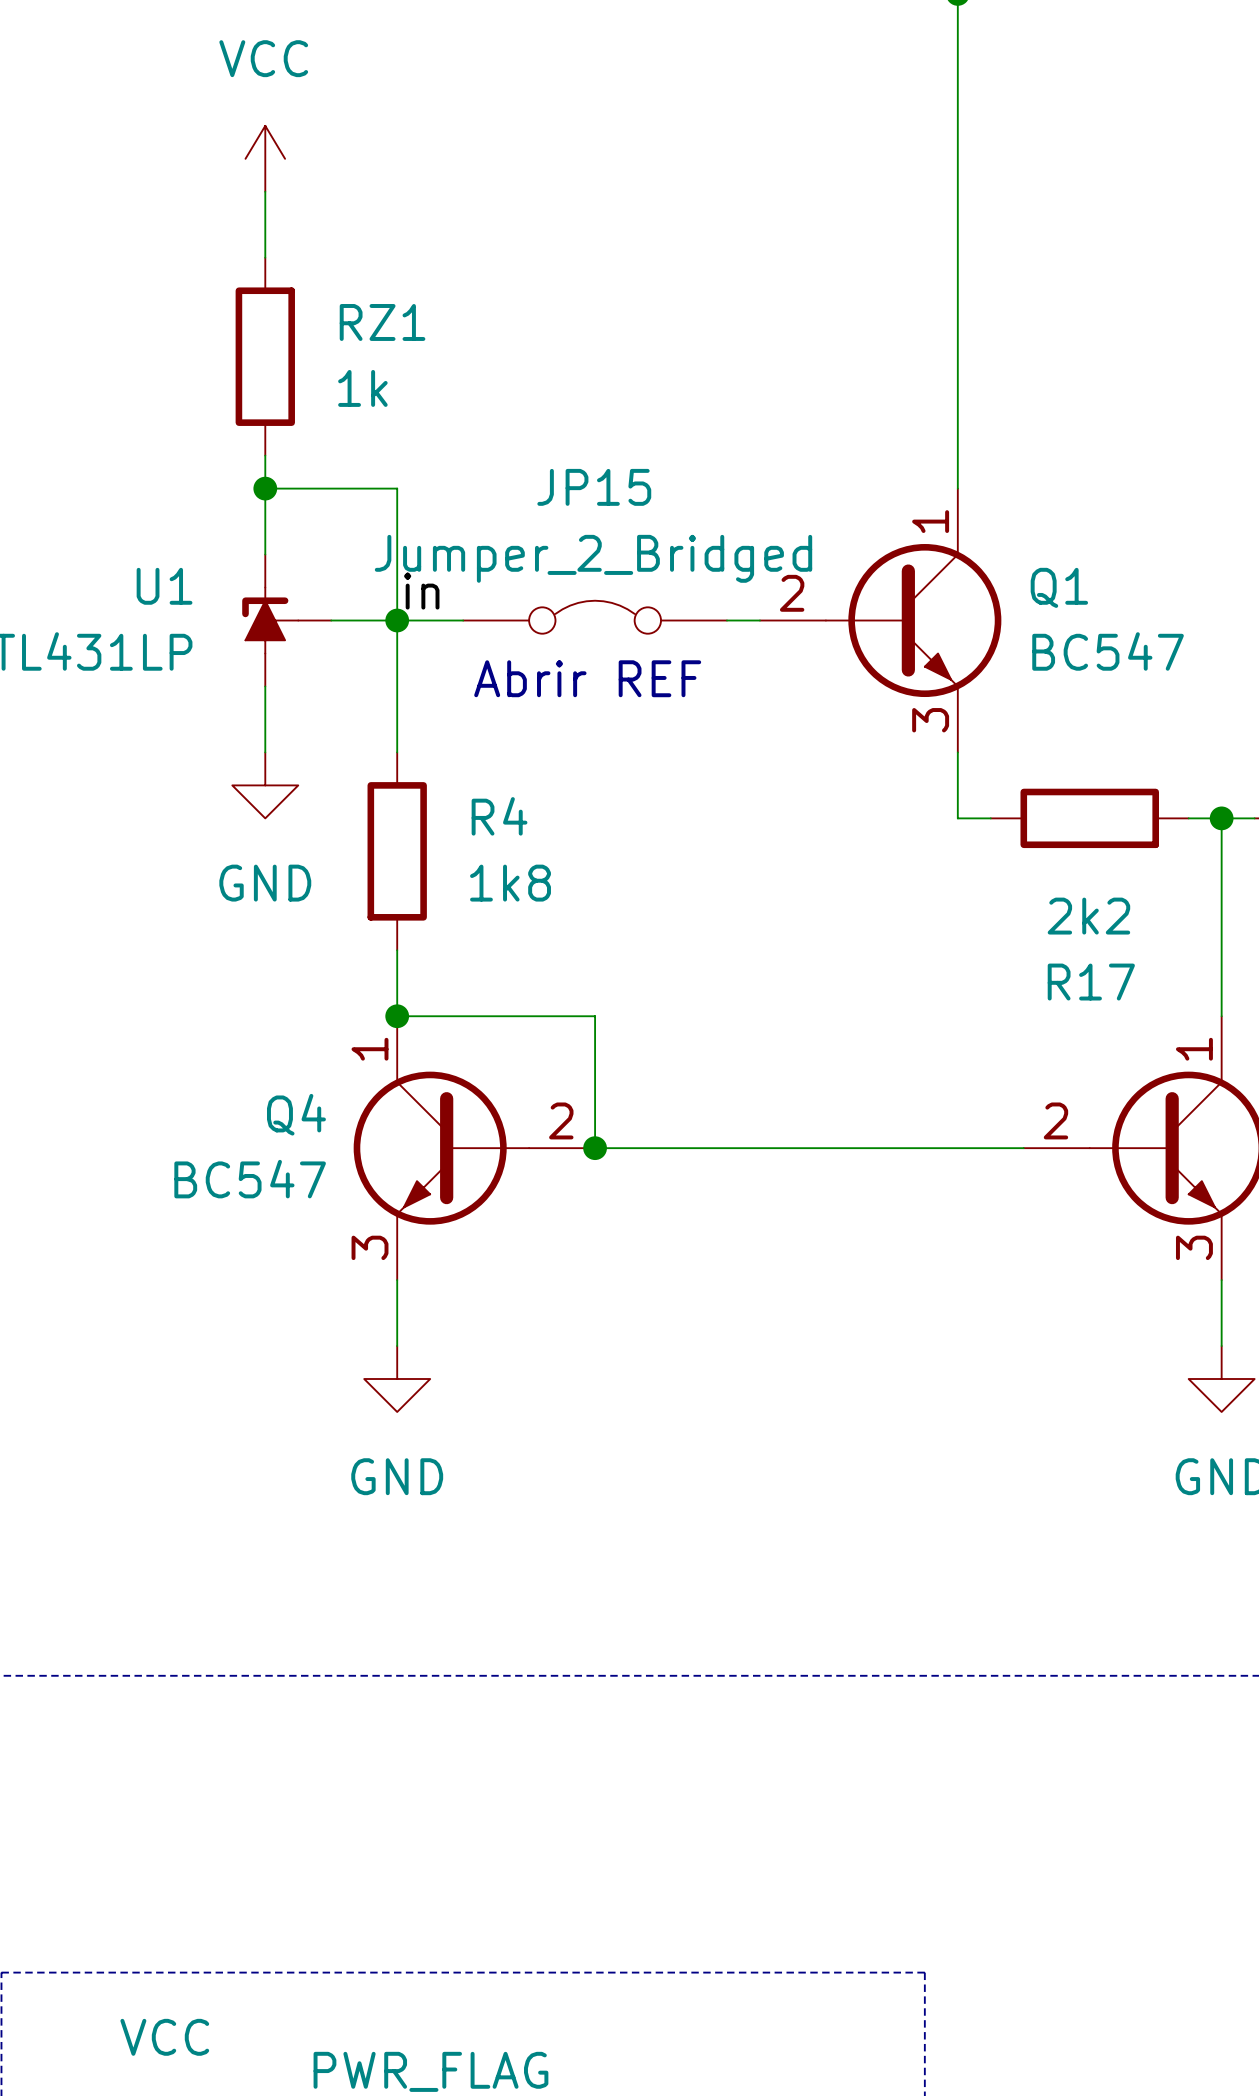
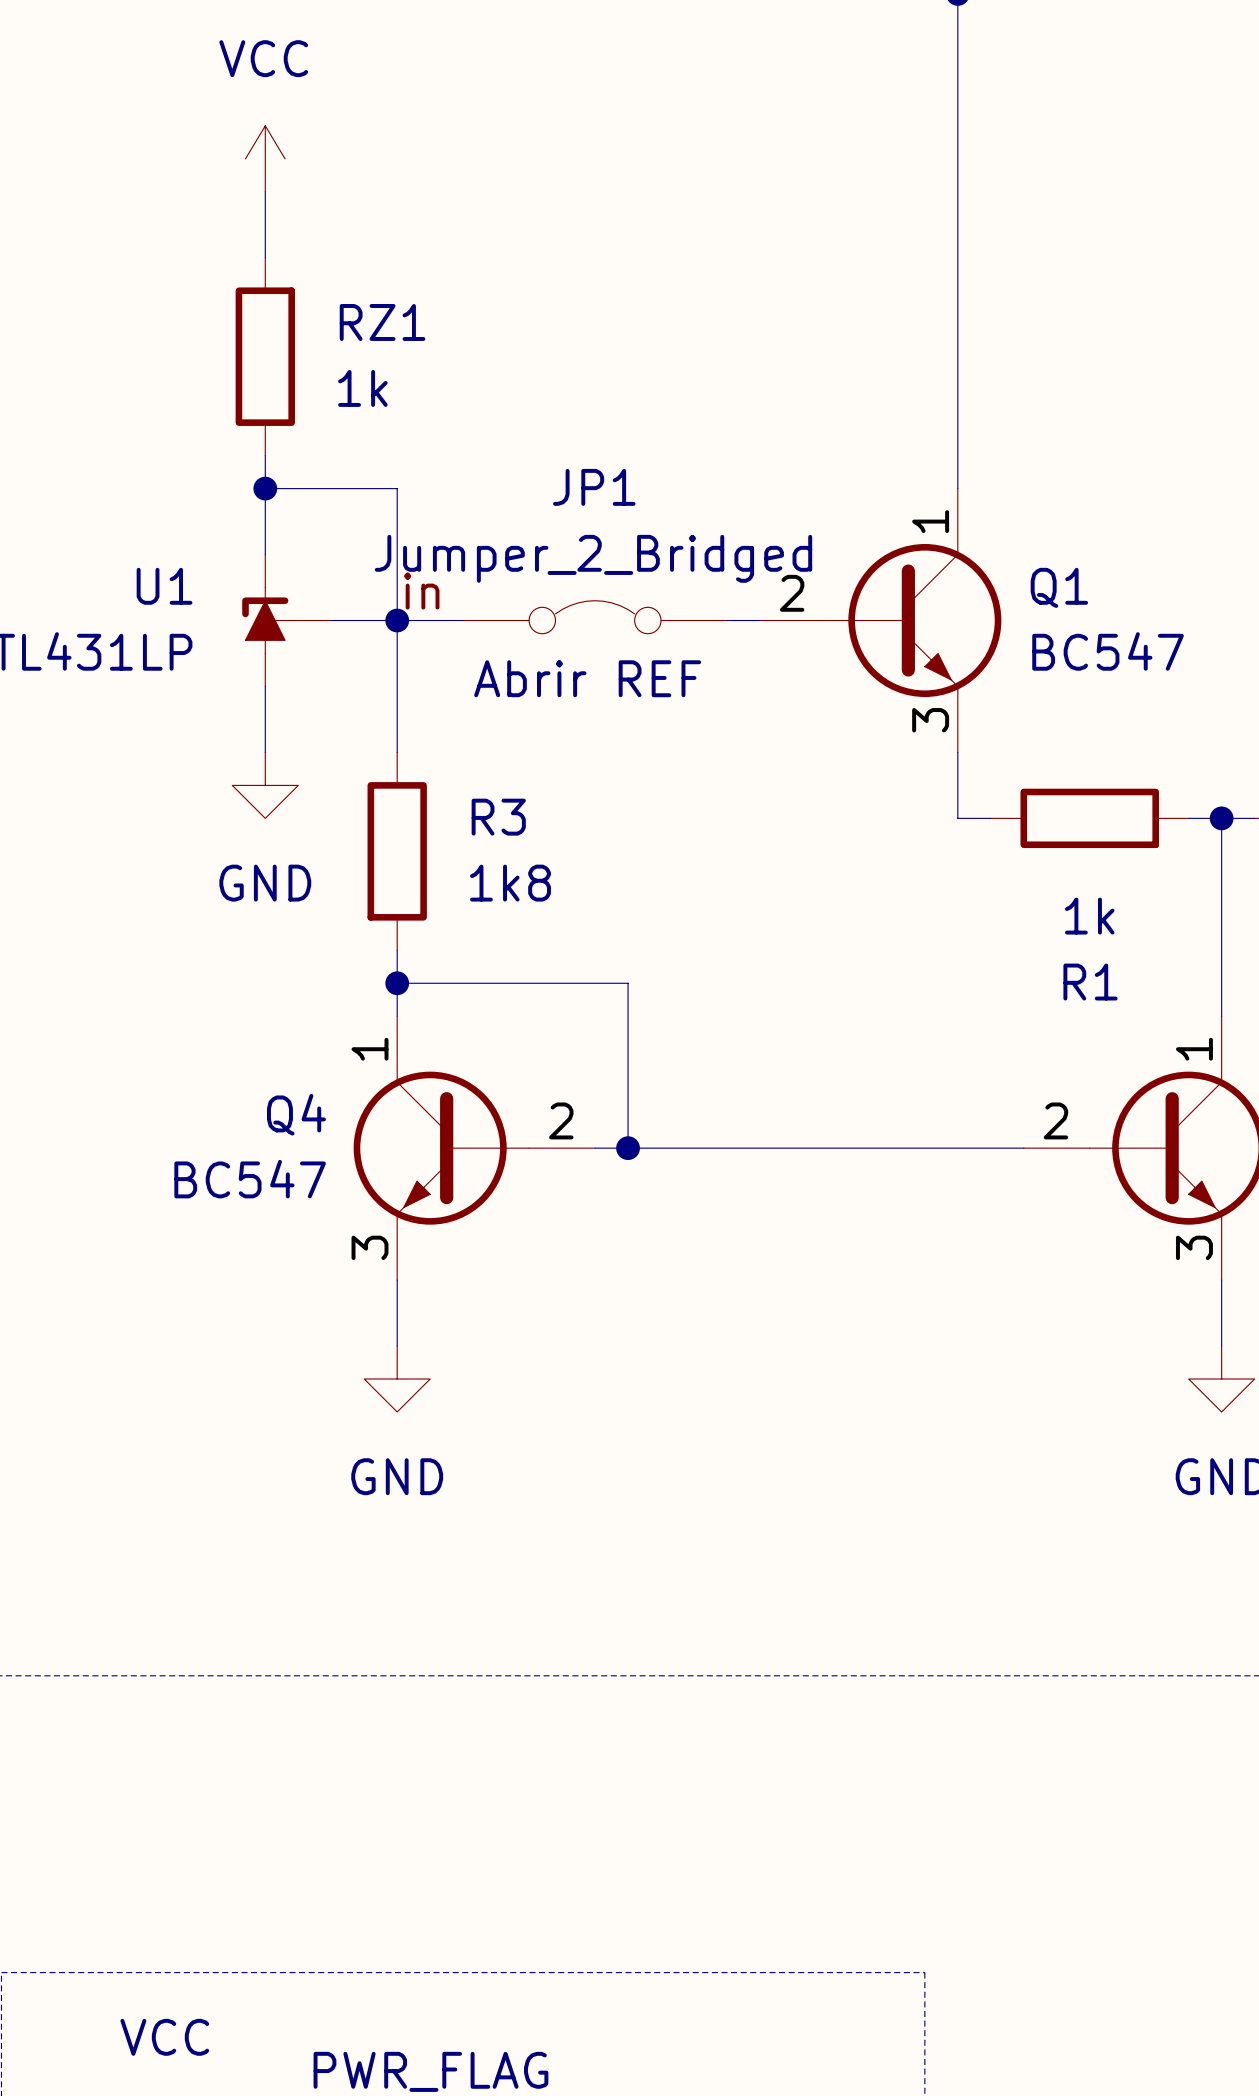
JP15 name: JP15 (594, 487) -> JP1 (594, 487)
R4 name: R4 (499, 816) -> R3 (498, 817)
R17 value: 2k2 (1088, 916) -> 1k (1089, 916)
R17 name: R17 (1091, 982) -> R1 (1090, 982)
wire: none -> (397, 983) (628, 983) (628, 1148)
wire: (397, 1016) (595, 1016) (595, 1148) -> none
junction position: (397, 1016) -> (397, 983)
junction position: (595, 1148) -> (628, 1148)

